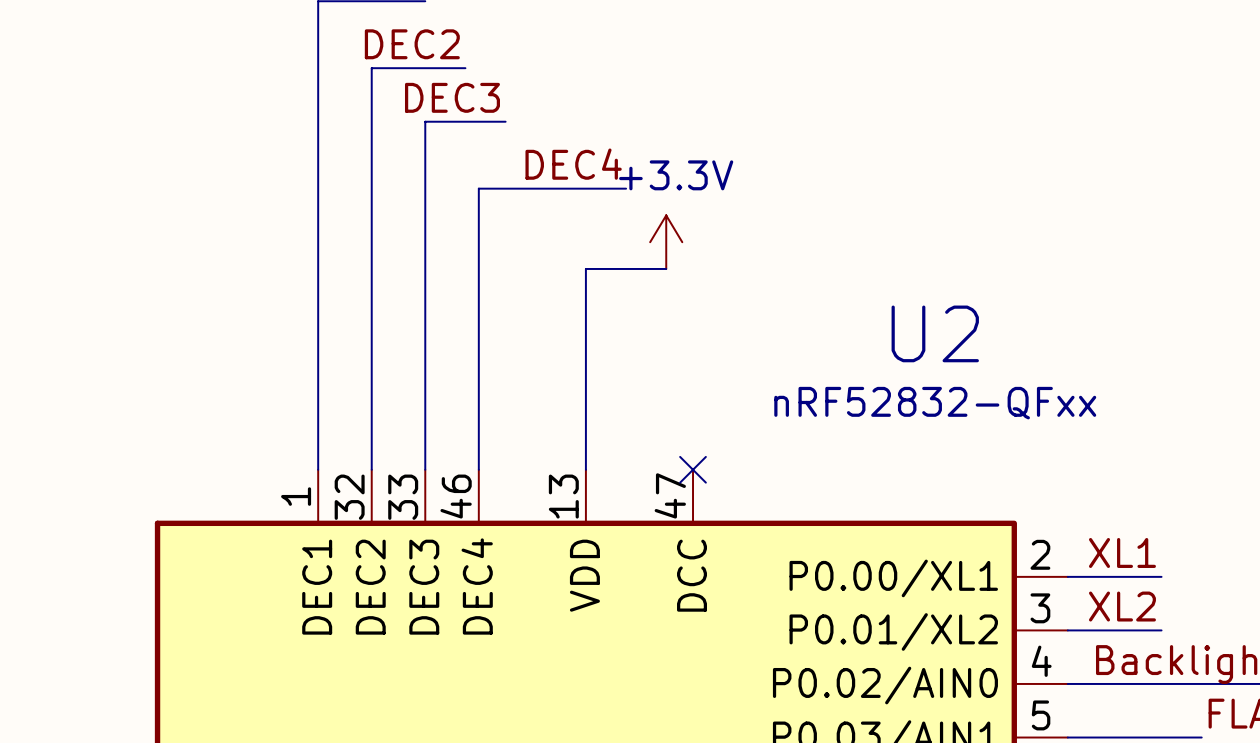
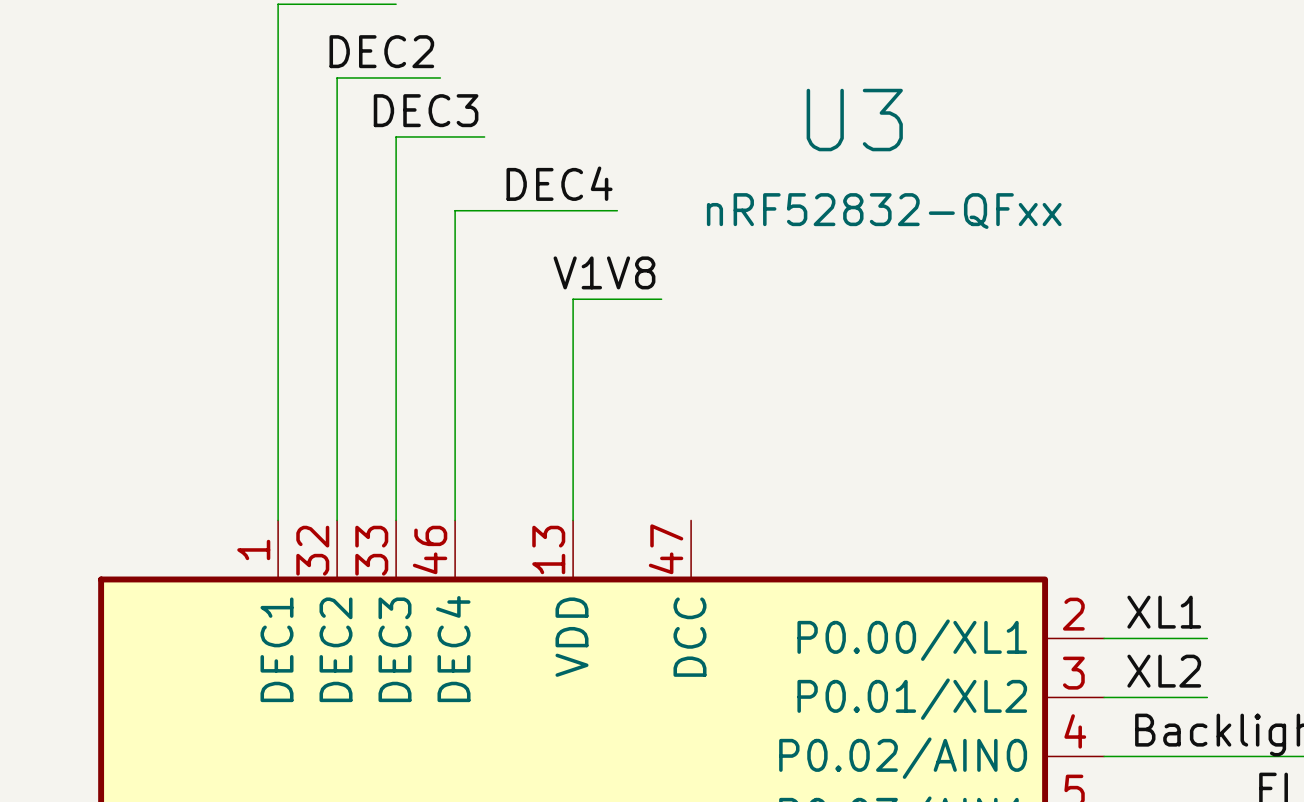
power symbol: +3.3V (666, 242) -> none
label: none -> V1V8 (604, 272)
U2 name: U2 (935, 333) -> U3 (854, 120)
U2 value position: nRF52832-QFxx (935, 403) -> nRF52832-QFxx (884, 211)
no-connect mark: (693, 469) -> none

